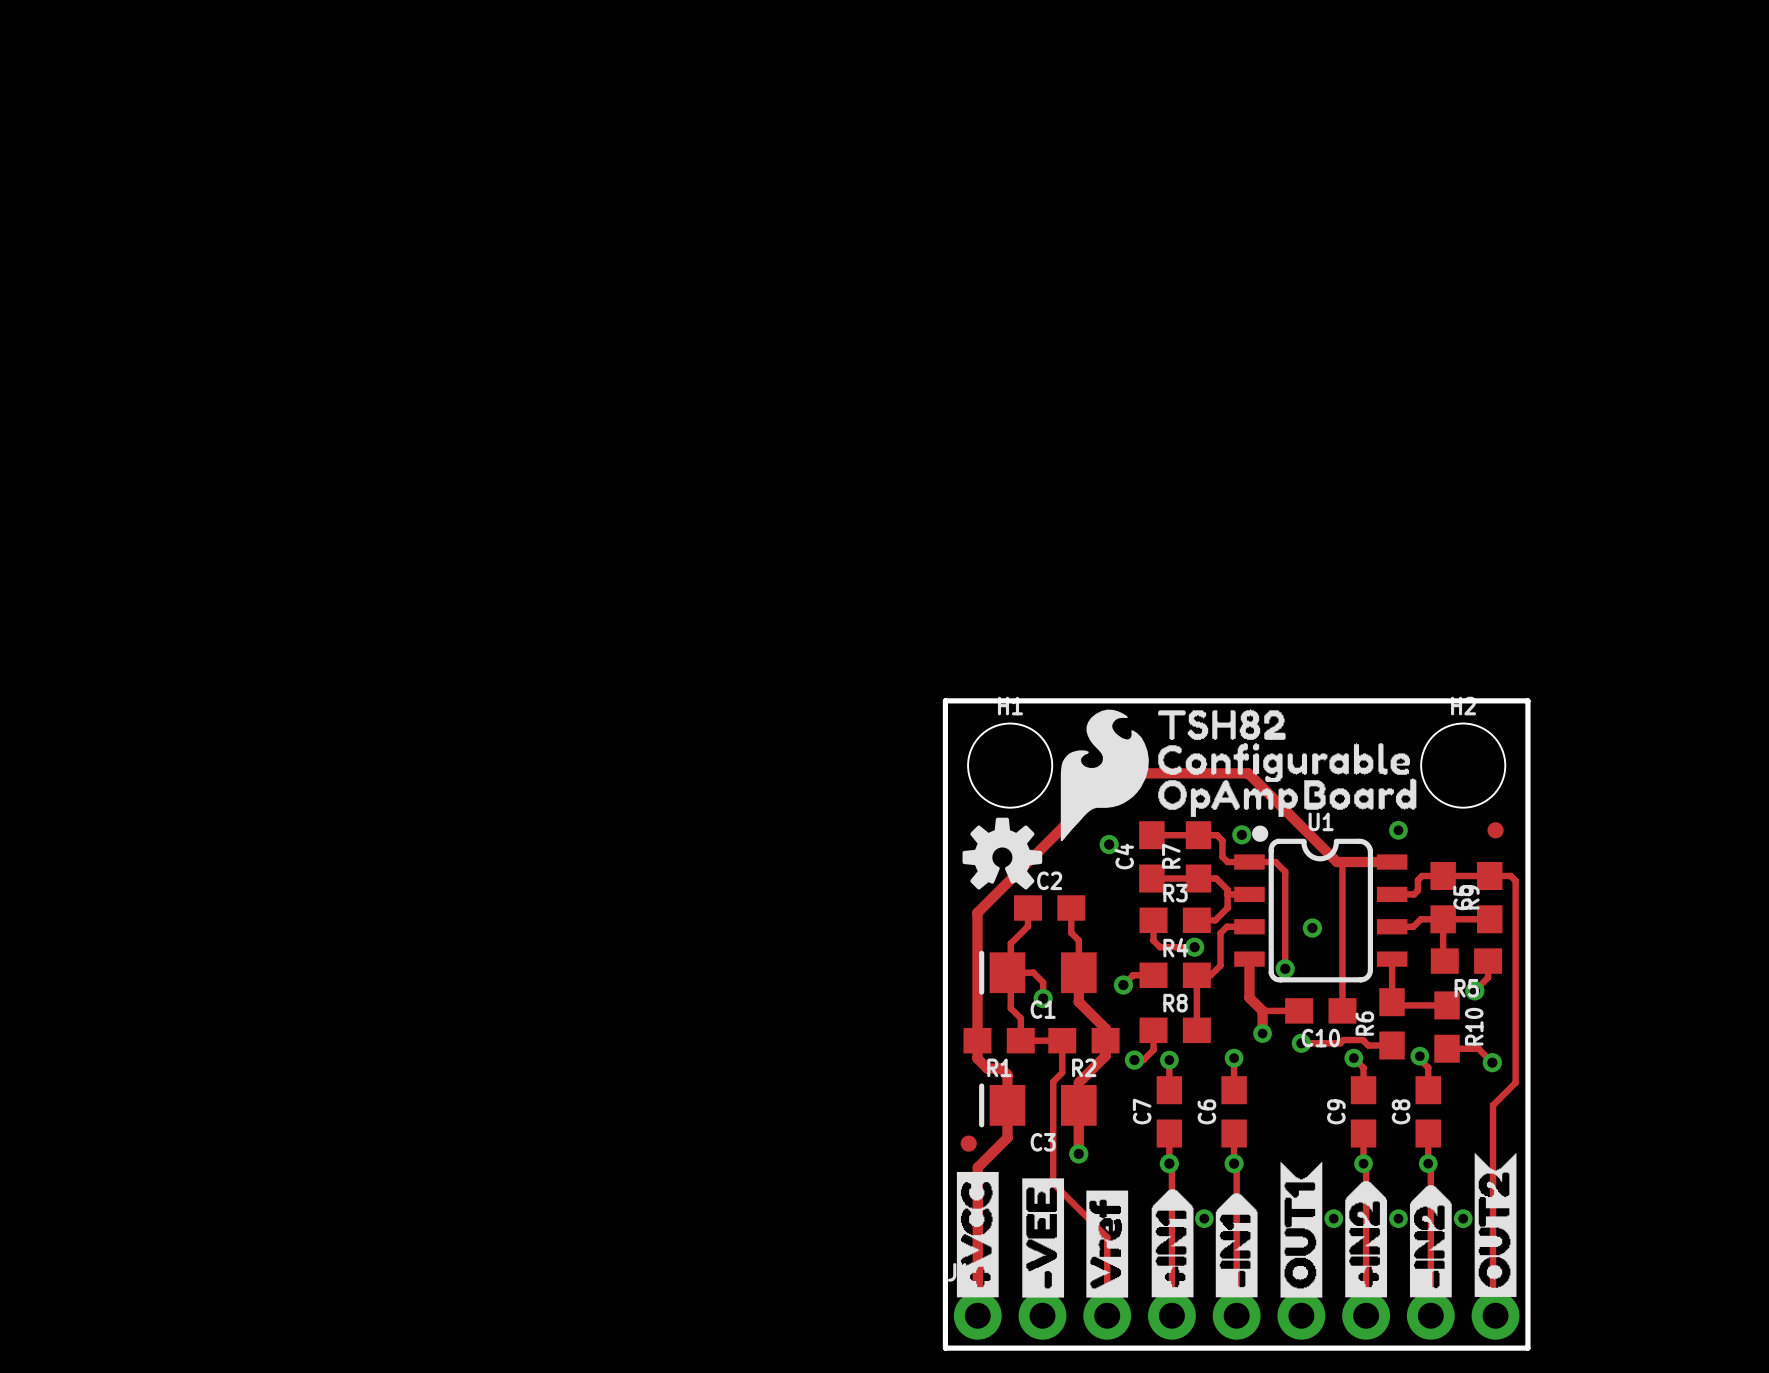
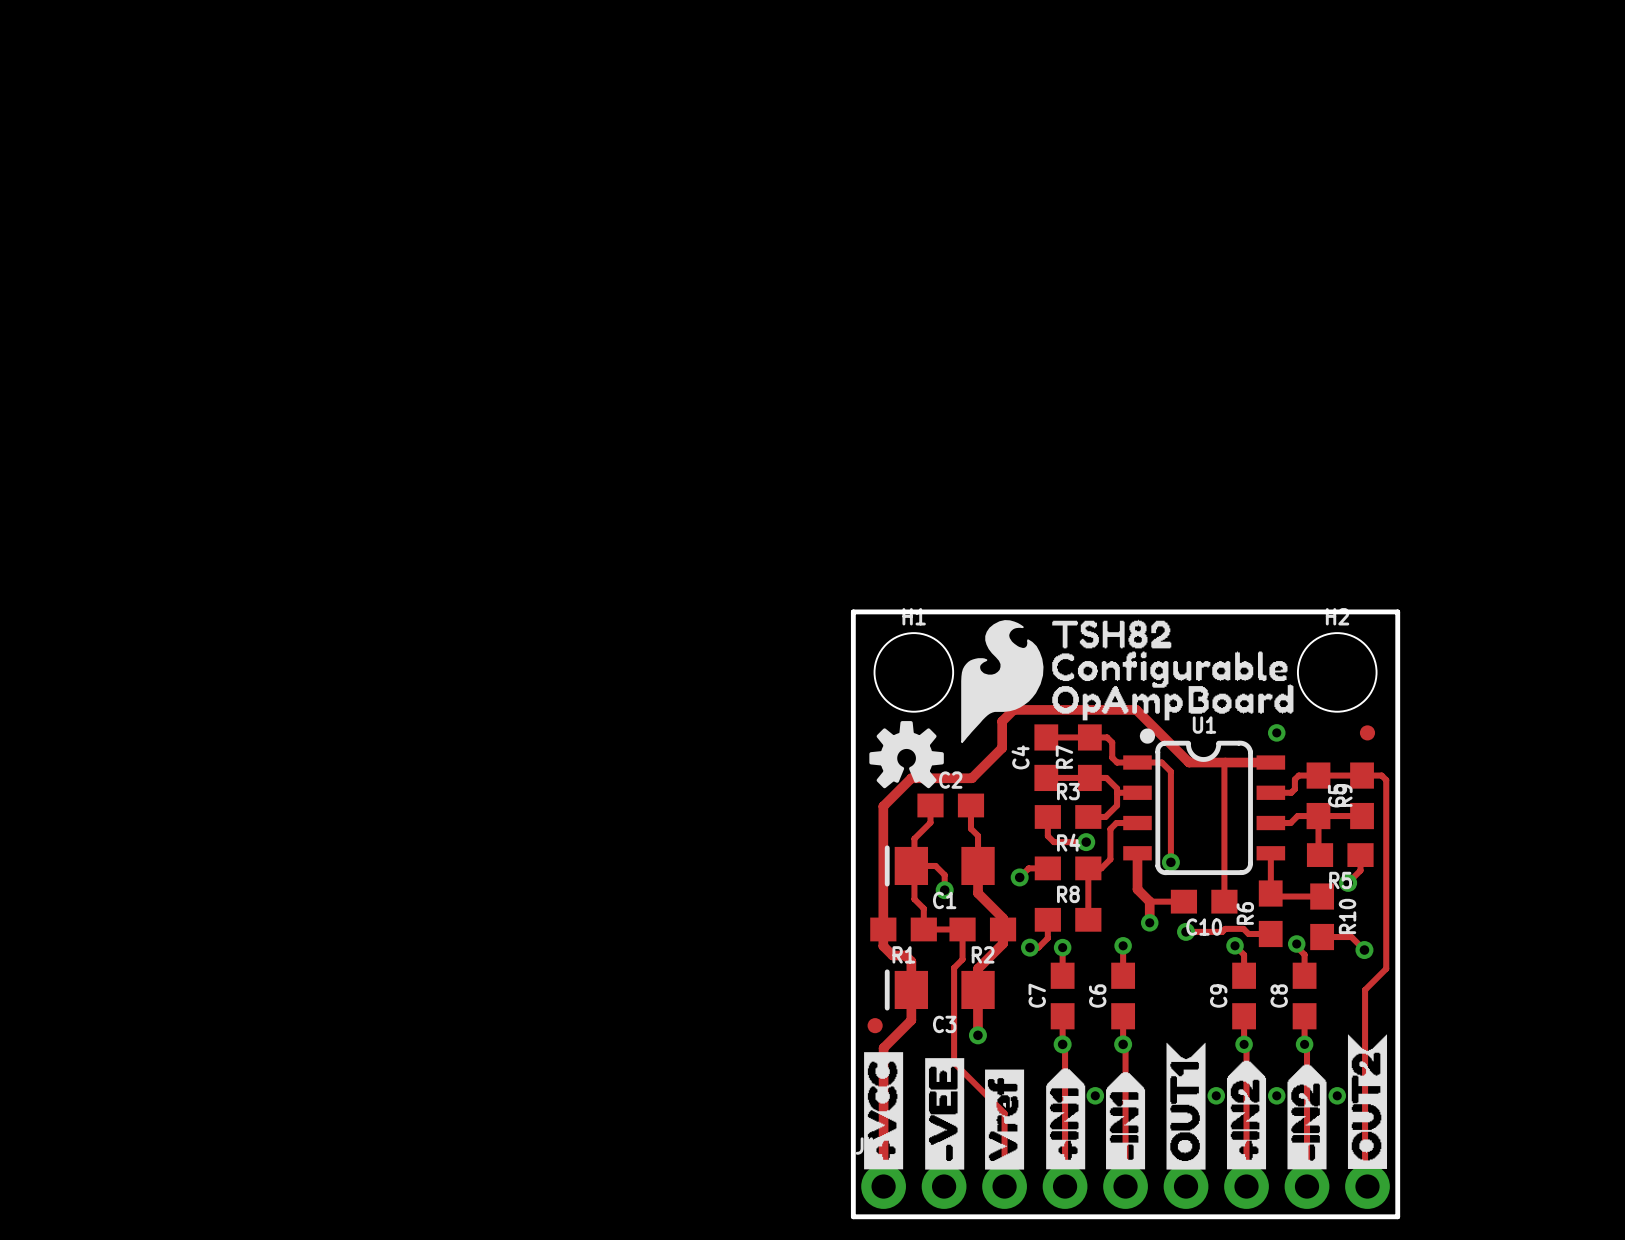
via: (1241, 834) -> none
via: (1109, 844) -> none
track: (1337, 862) (1248, 773) (1116, 773) (977, 912) -> (1219, 762) (1189, 762) (1136, 709) (1013, 709) (1002, 721) (1002, 748) (971, 778) (911, 778) (883, 806) (883, 809)
via: (1312, 928) -> none

